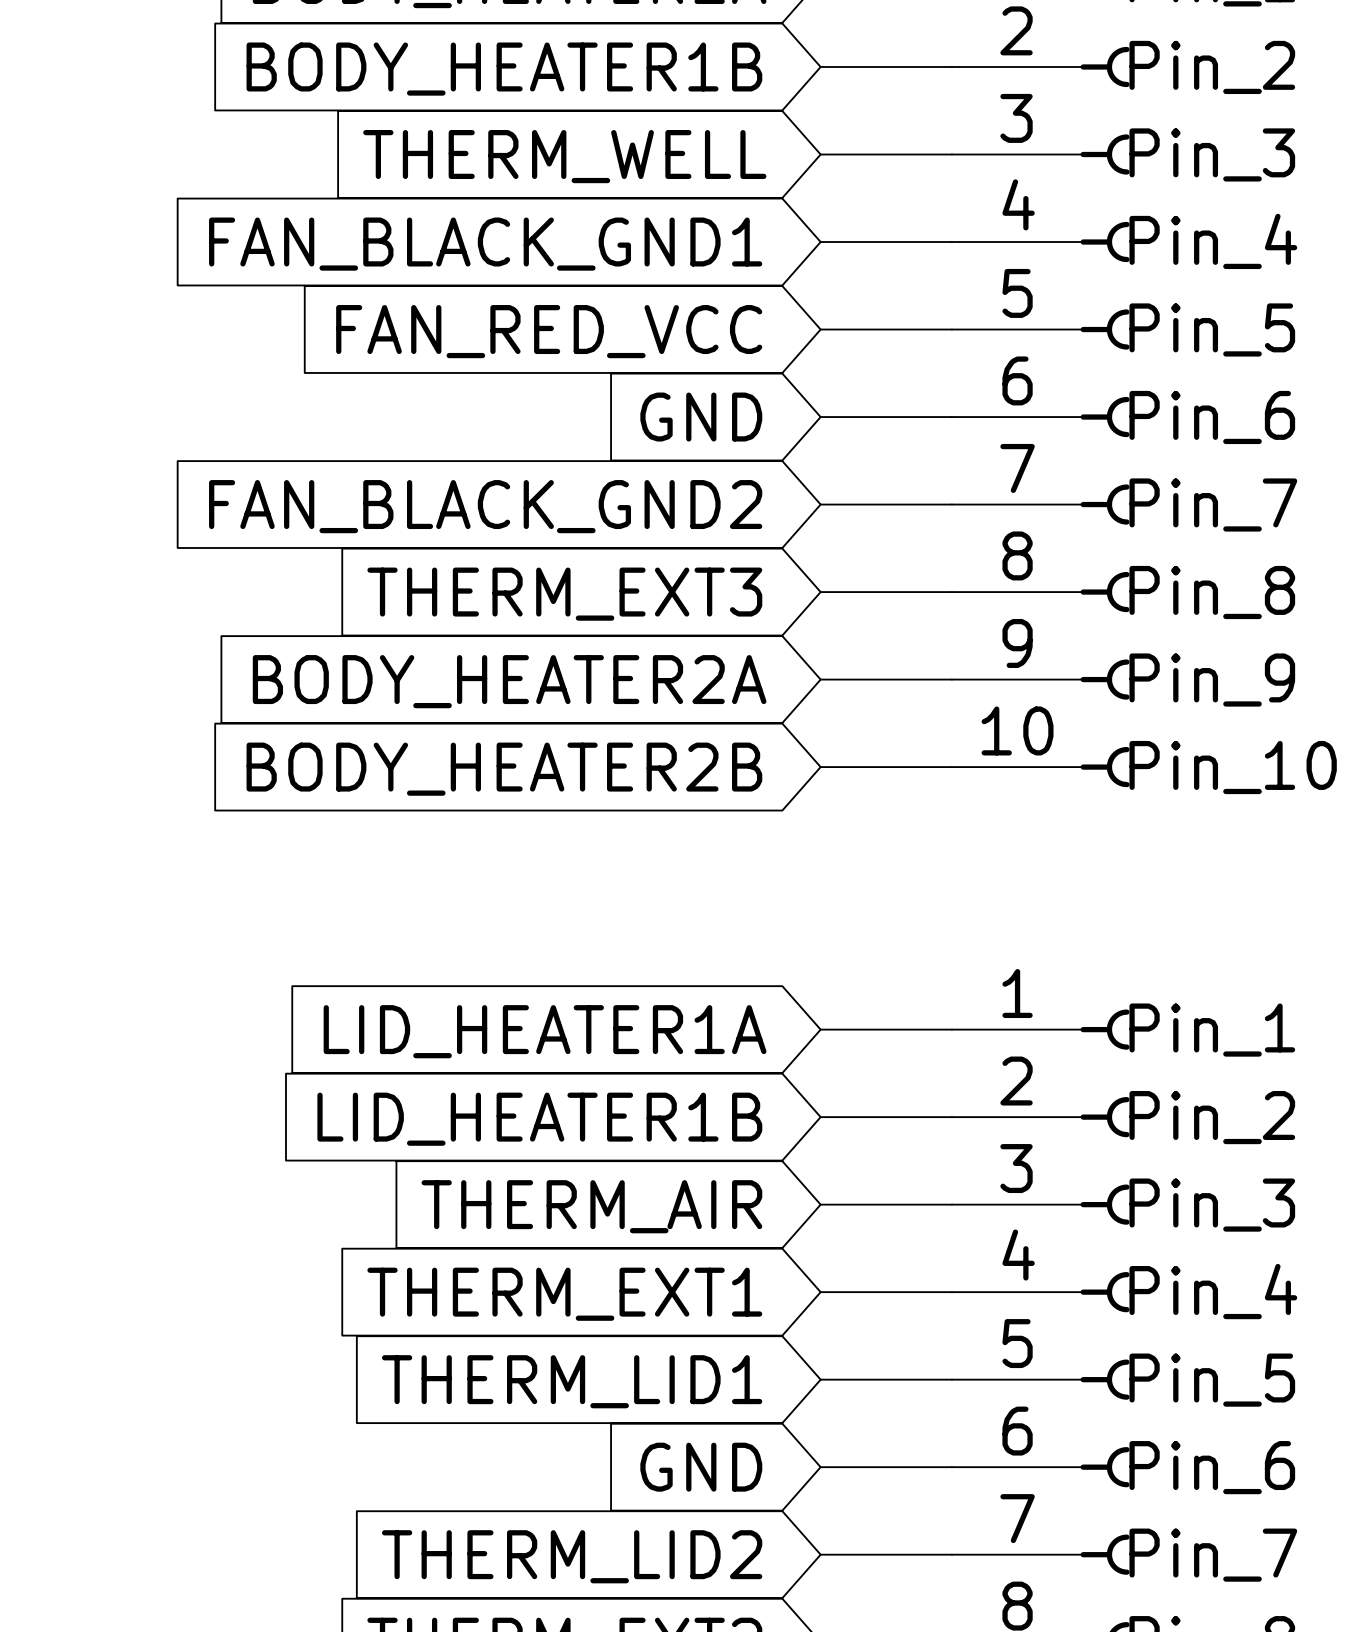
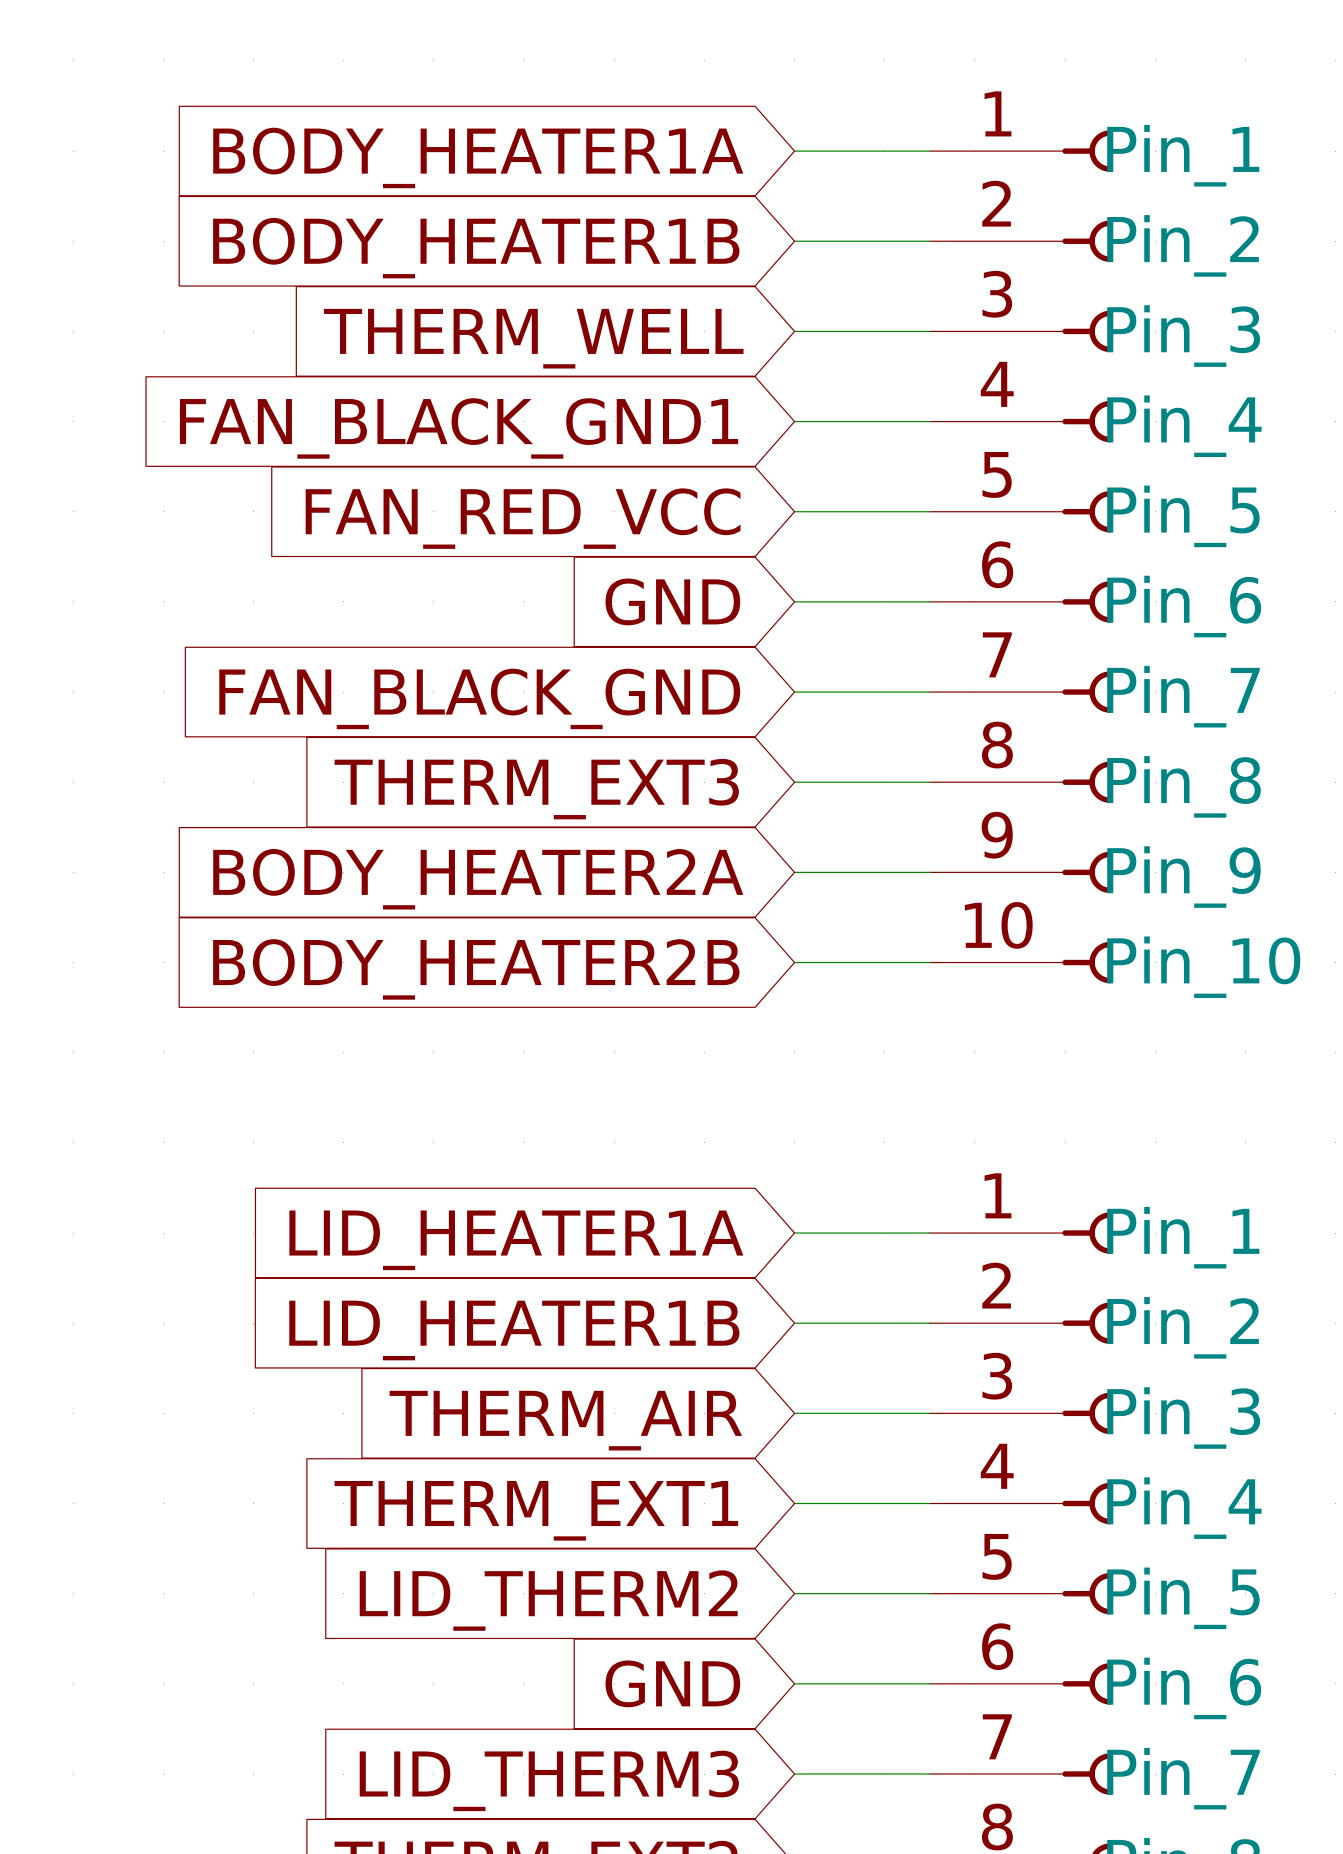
global label: FAN_BLACK_GND2 (485, 506) -> FAN_BLACK_GND (479, 698)
global label: THERM_LID1 (572, 1381) -> LID_THERM2 (548, 1600)
global label: THERM_LID2 (572, 1556) -> LID_THERM3 (549, 1780)

